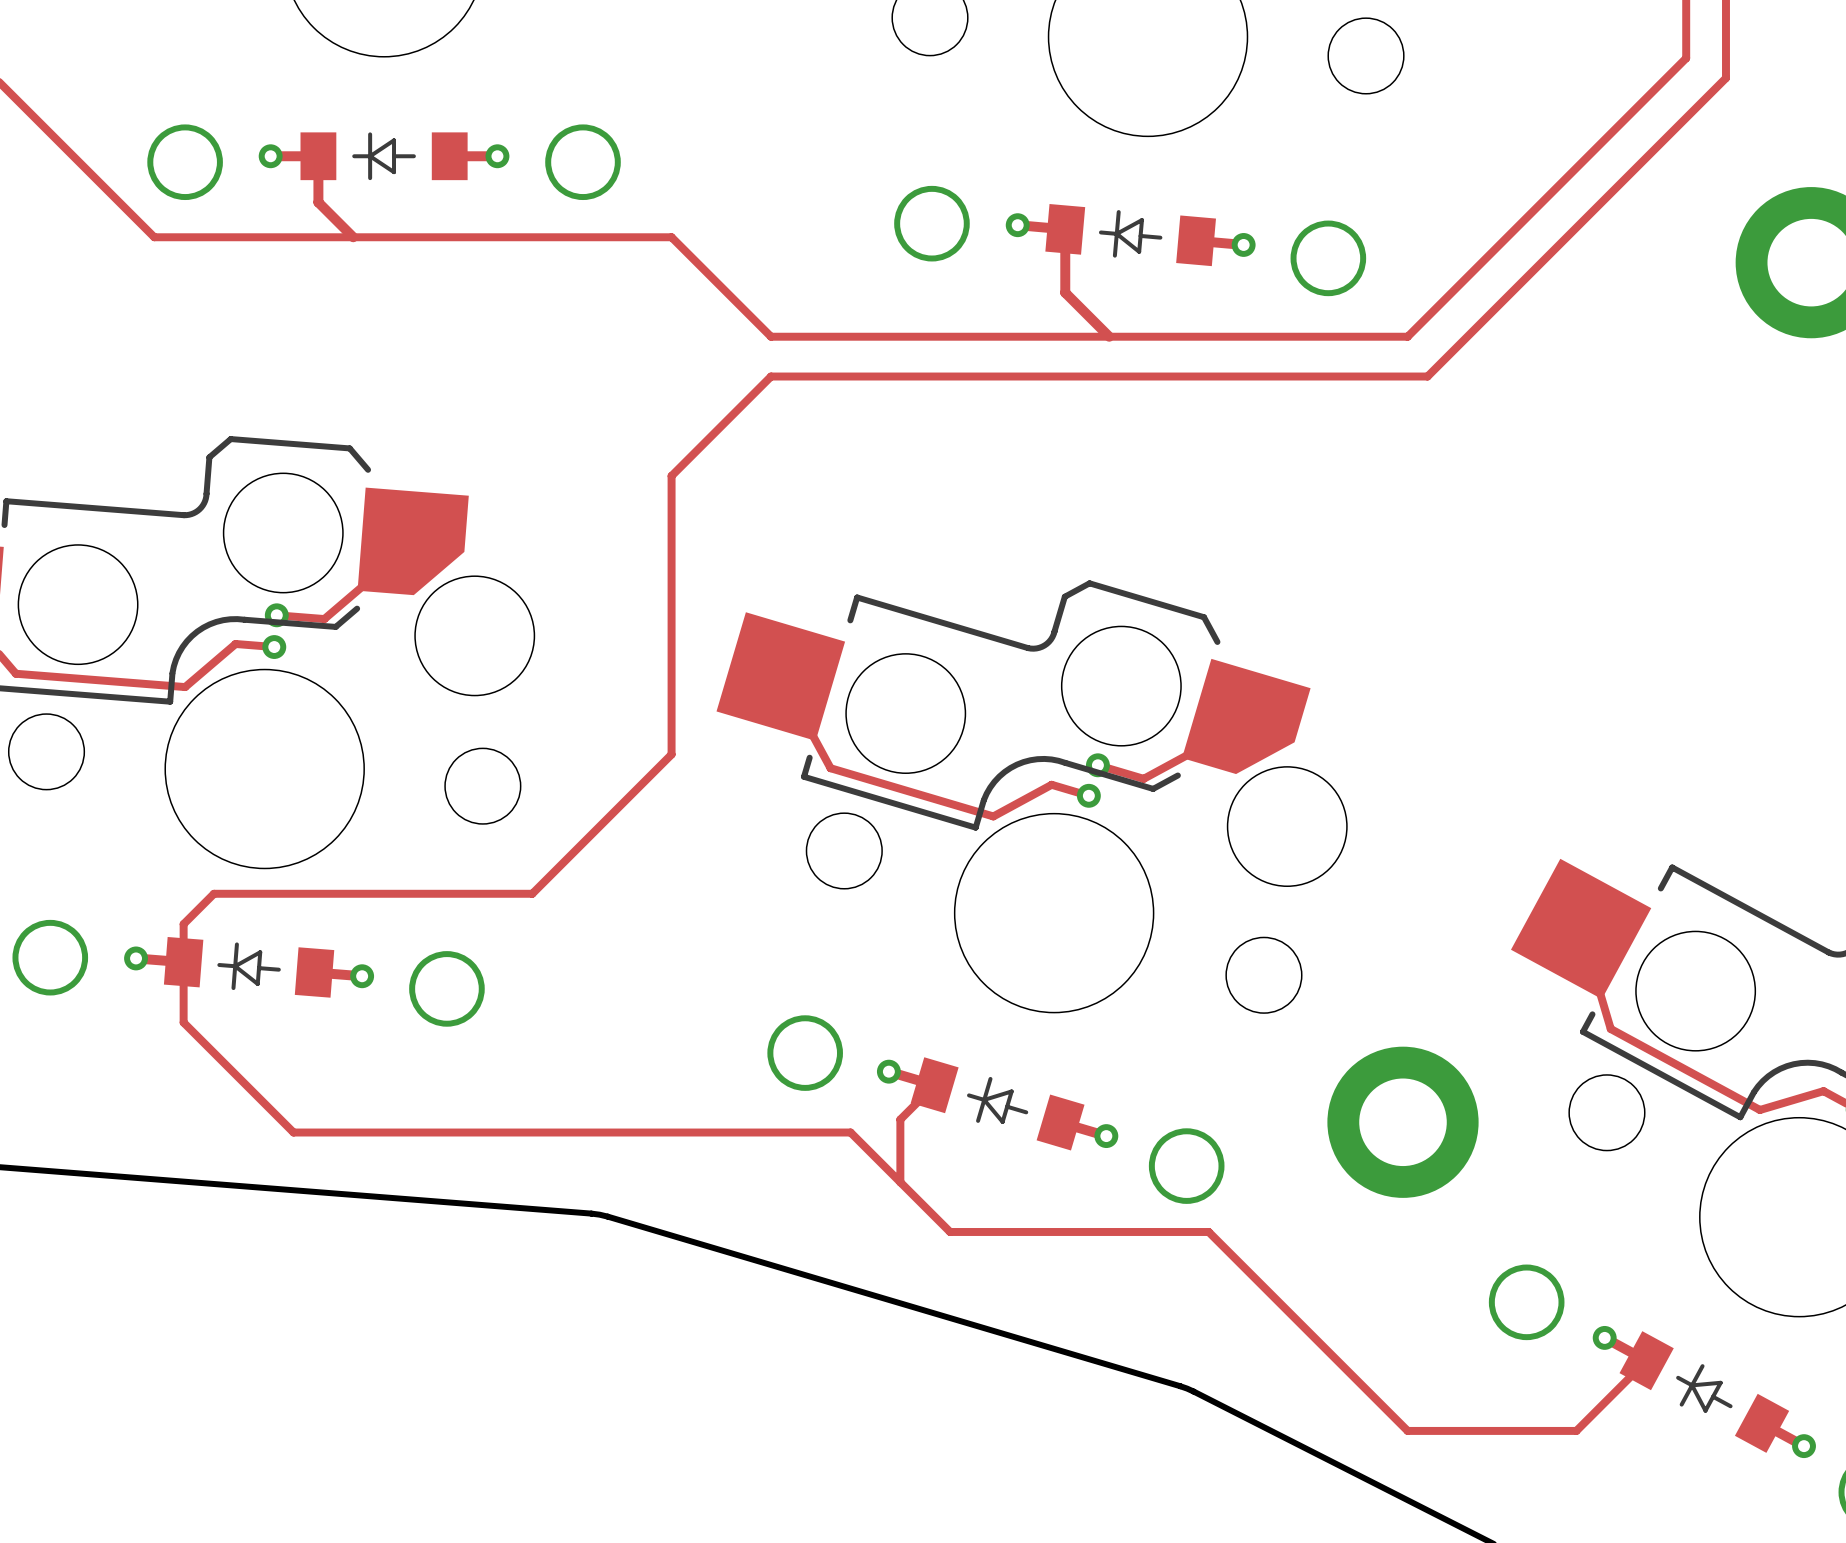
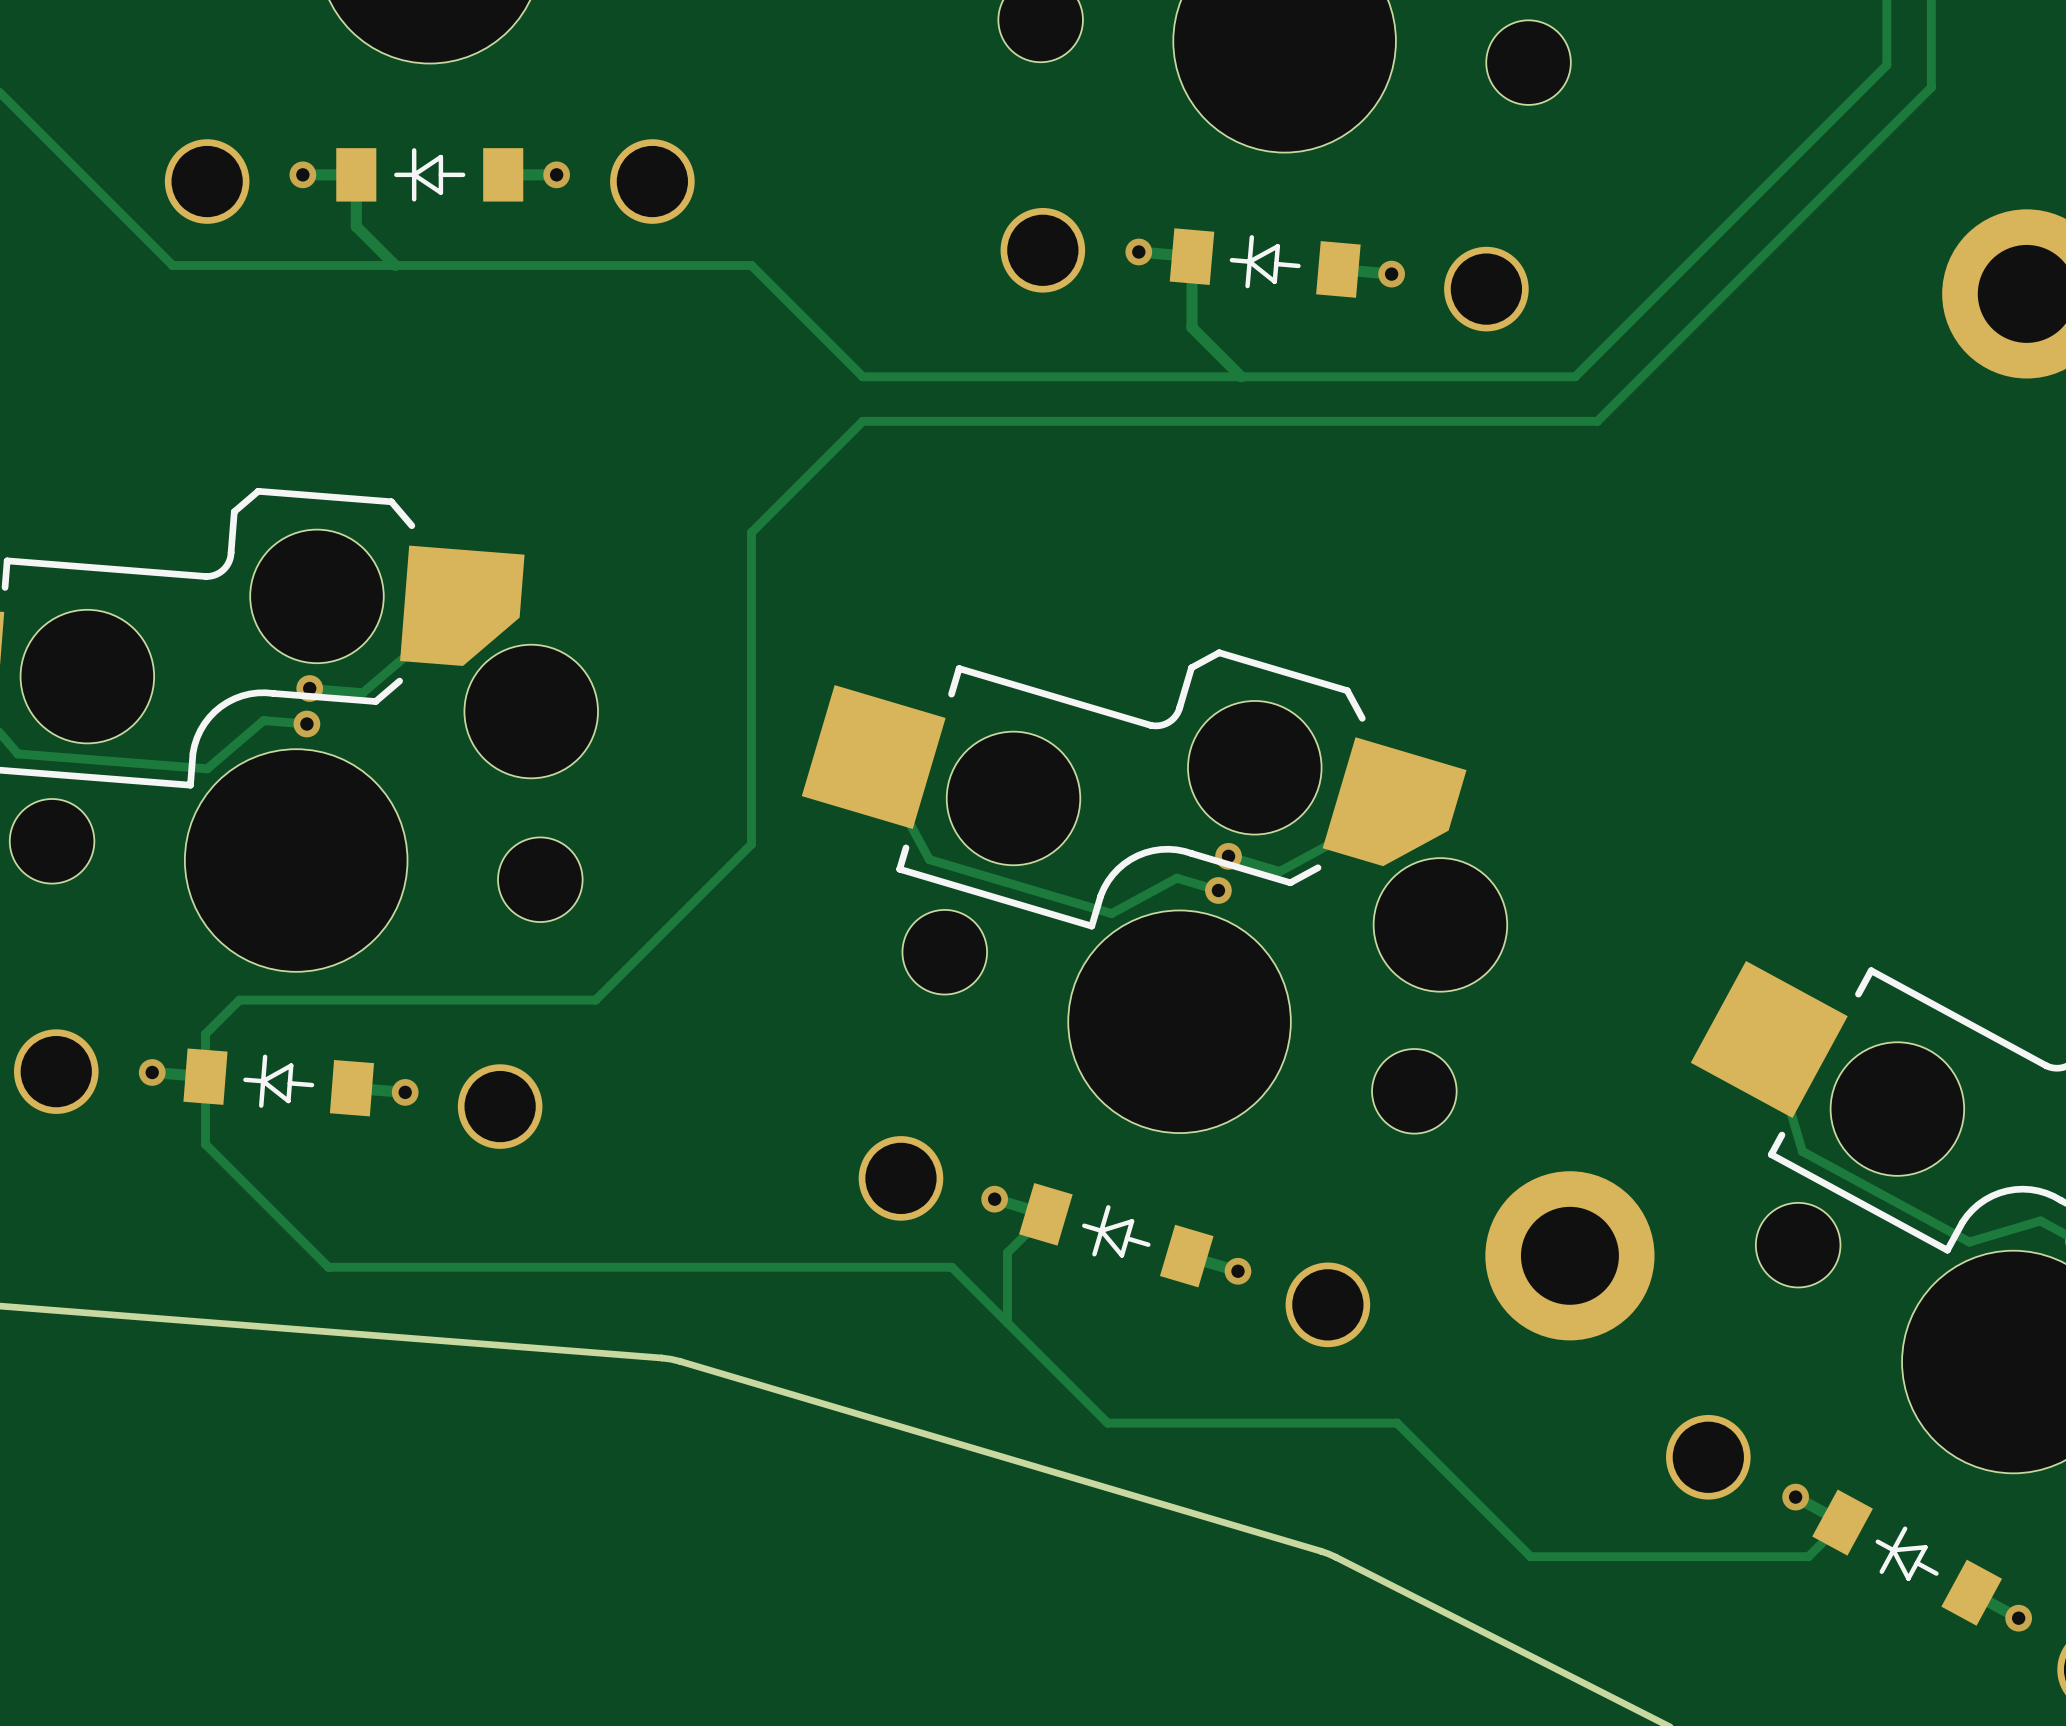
track: (950, 1231) (1208, 1231) (1248, 1271) -> (1063, 1378) (1107, 1423) (1397, 1423)
track: (1367, 1391) (1407, 1430) (1576, 1430) (1616, 1391) -> (1530, 1556) (1808, 1556)

